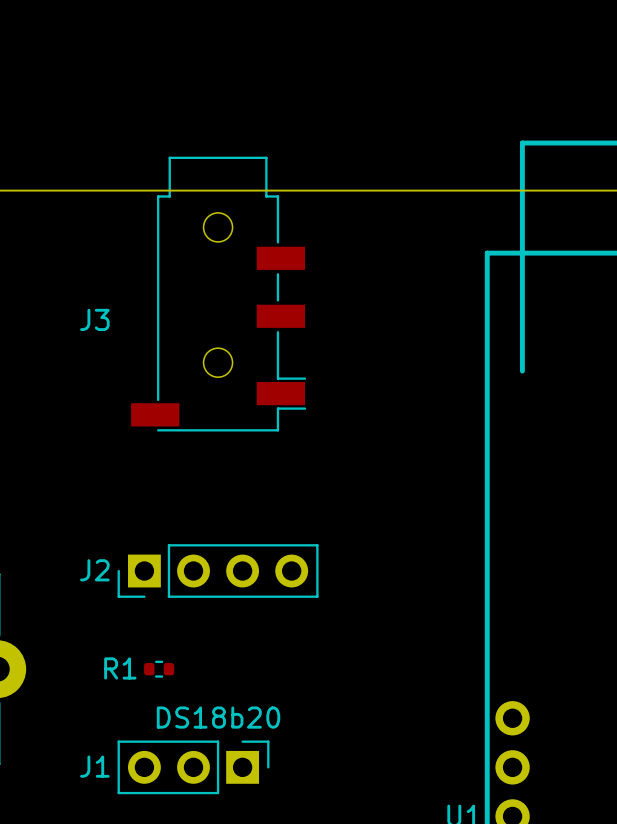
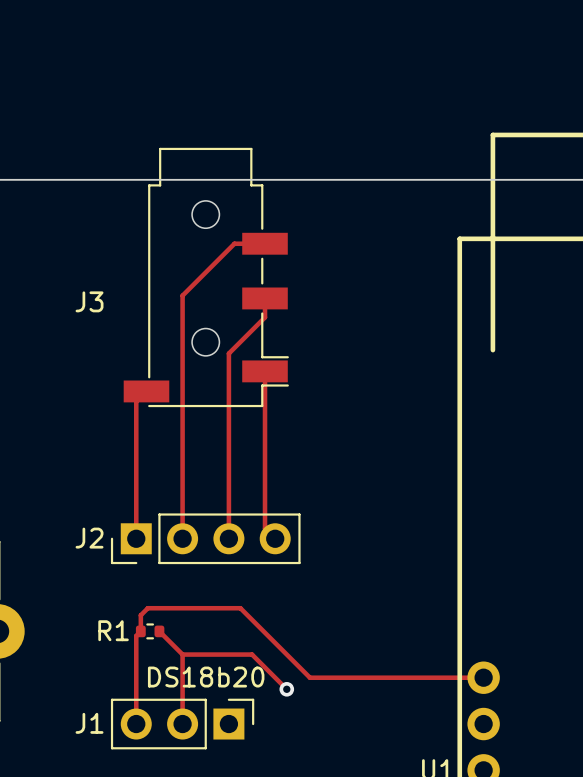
track: none -> (265, 243) (234, 243) (182, 295) (182, 538)
track: none -> (265, 298) (265, 317) (228, 353) (228, 538)
track: none -> (265, 371) (265, 528) (275, 538)
track: none -> (146, 391) (136, 401) (136, 538)
track: none -> (159, 631) (182, 654)
track: none -> (182, 654) (252, 654) (286, 689)
track: none -> (182, 654) (182, 724)
track: none -> (483, 677) (309, 677) (240, 608) (147, 608) (140, 615) (140, 631) (136, 635) (136, 724)
via: none -> (286, 689)

